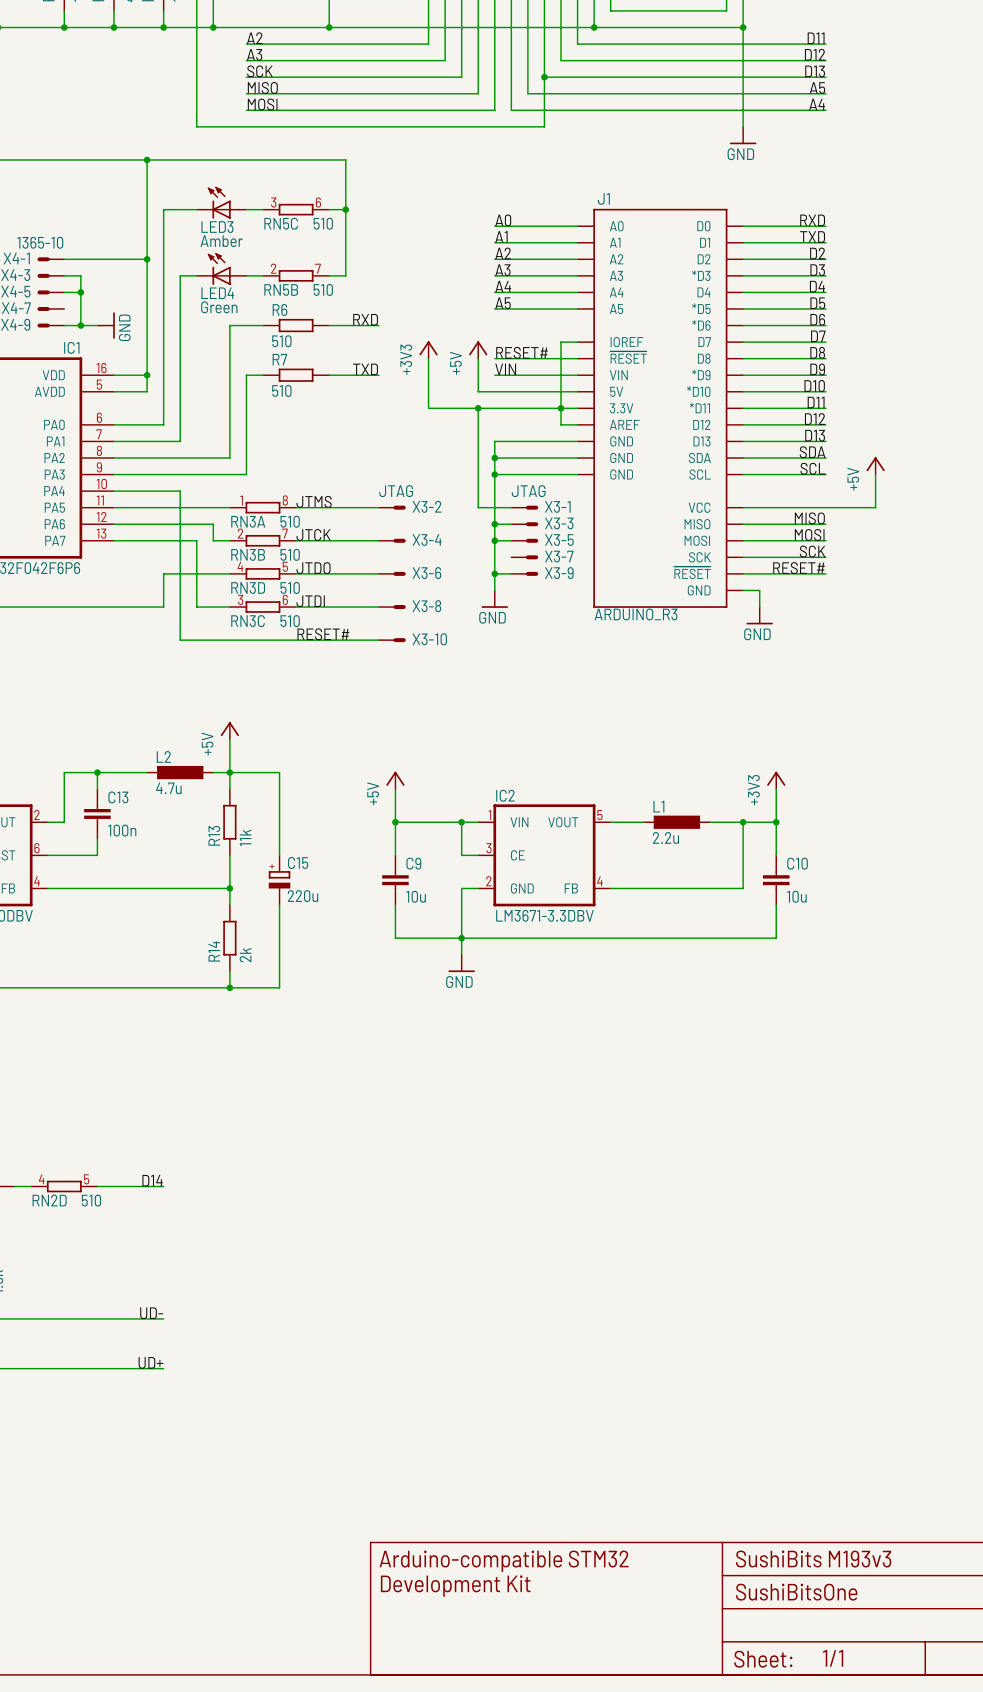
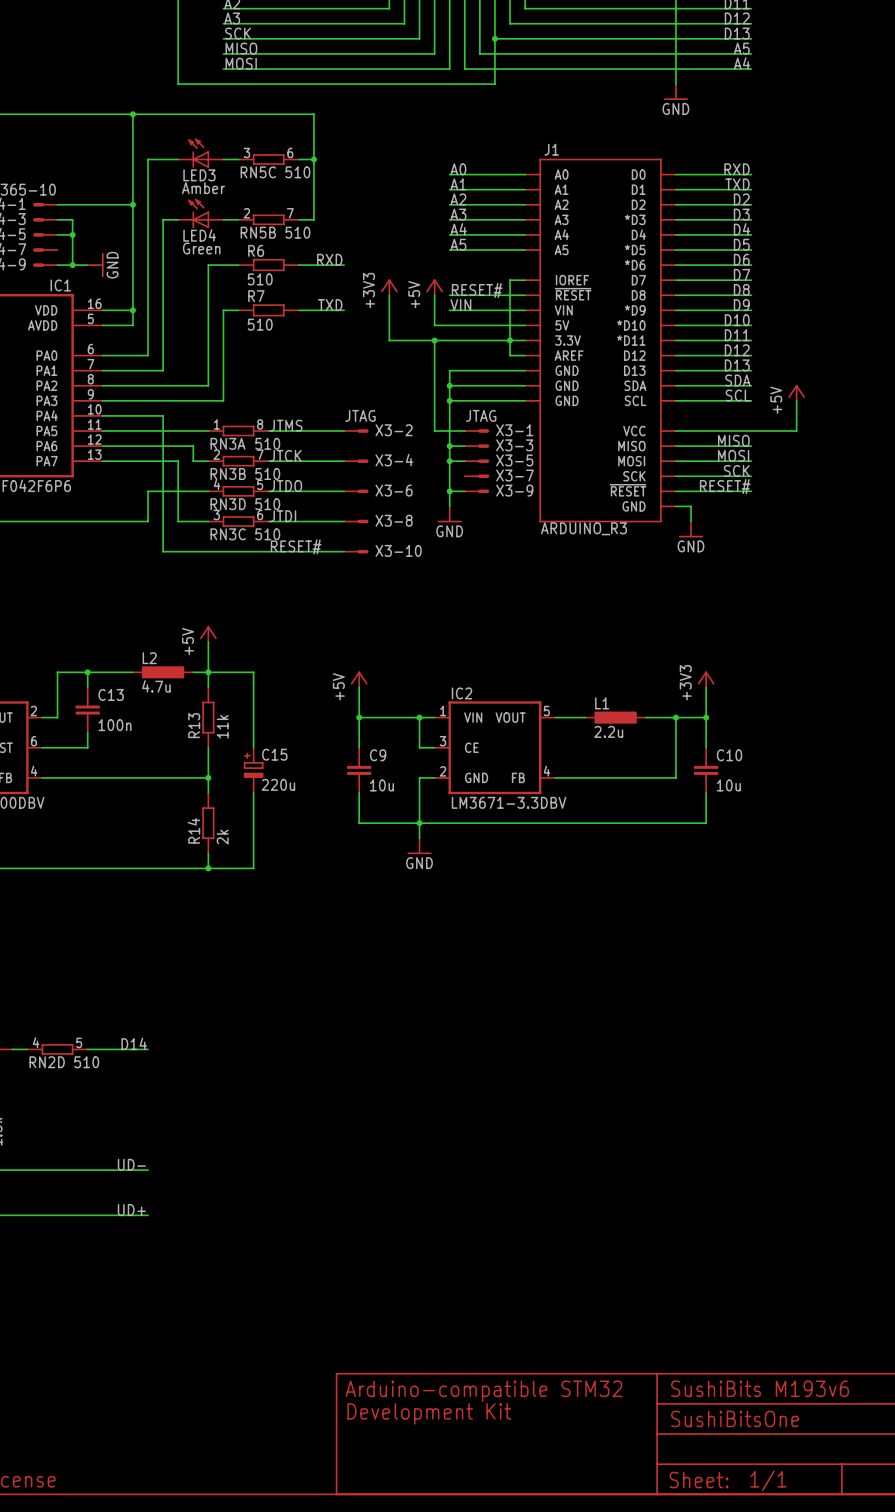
text: SushiBits M193v3 (813, 1559) -> SushiBits M193v6 (760, 1388)

